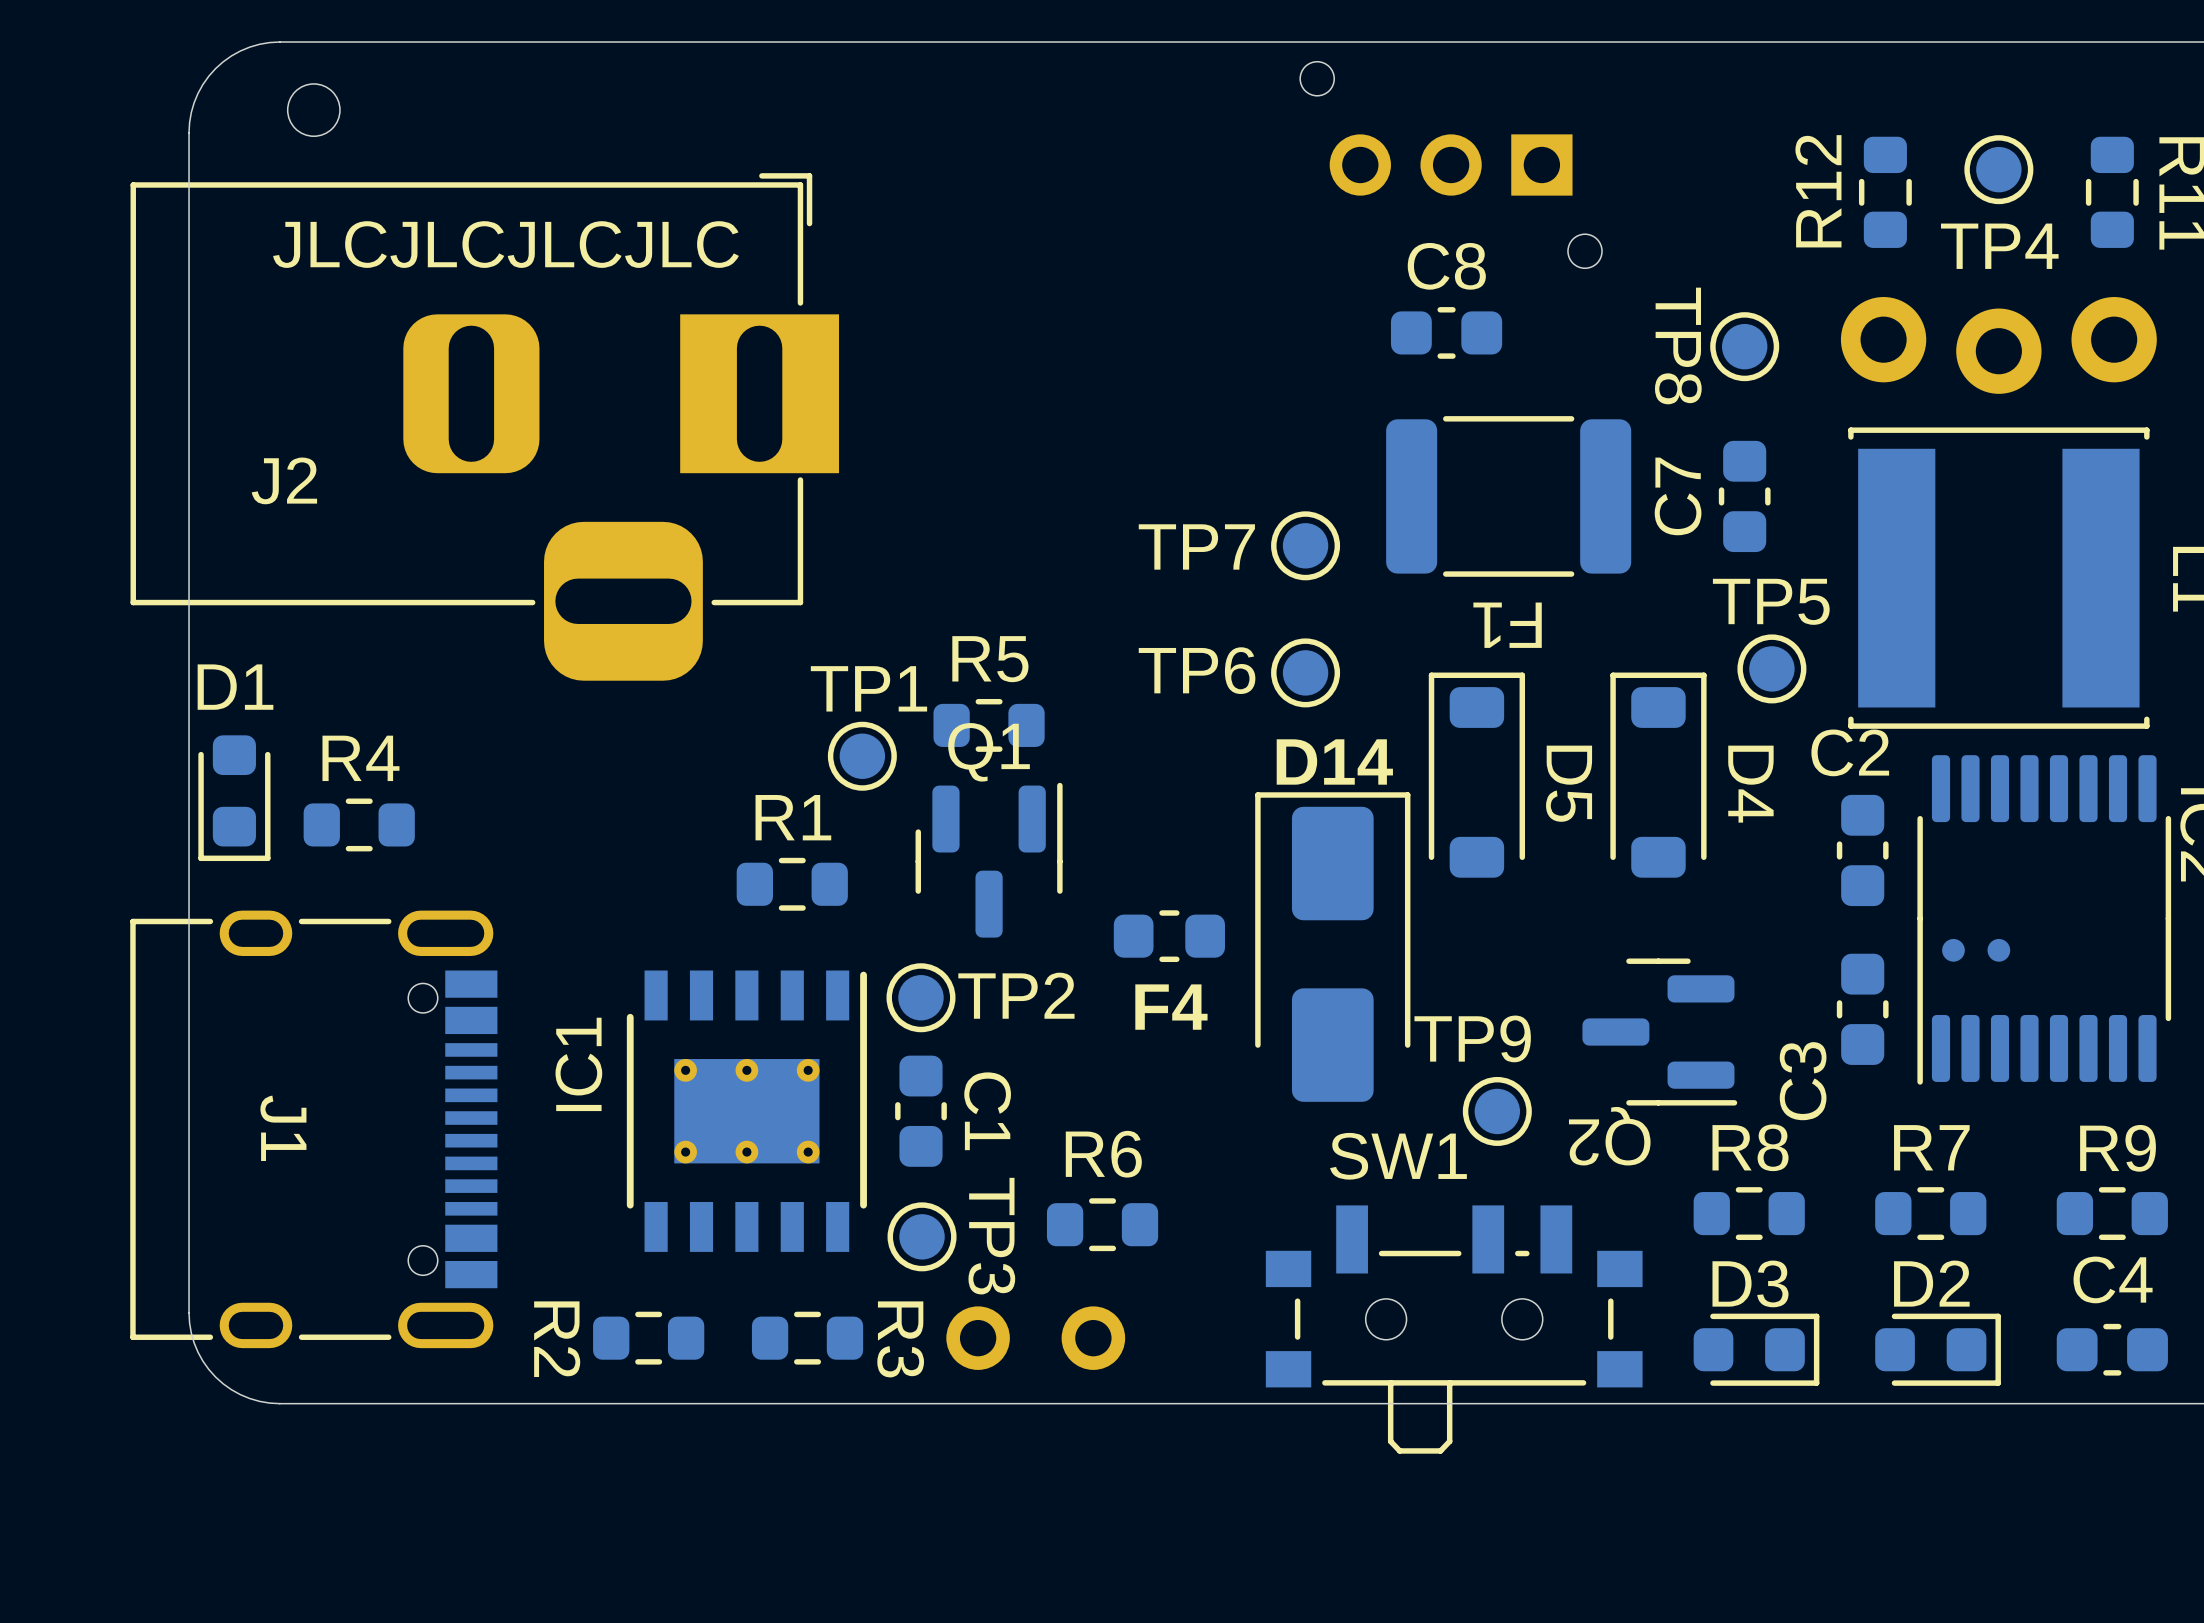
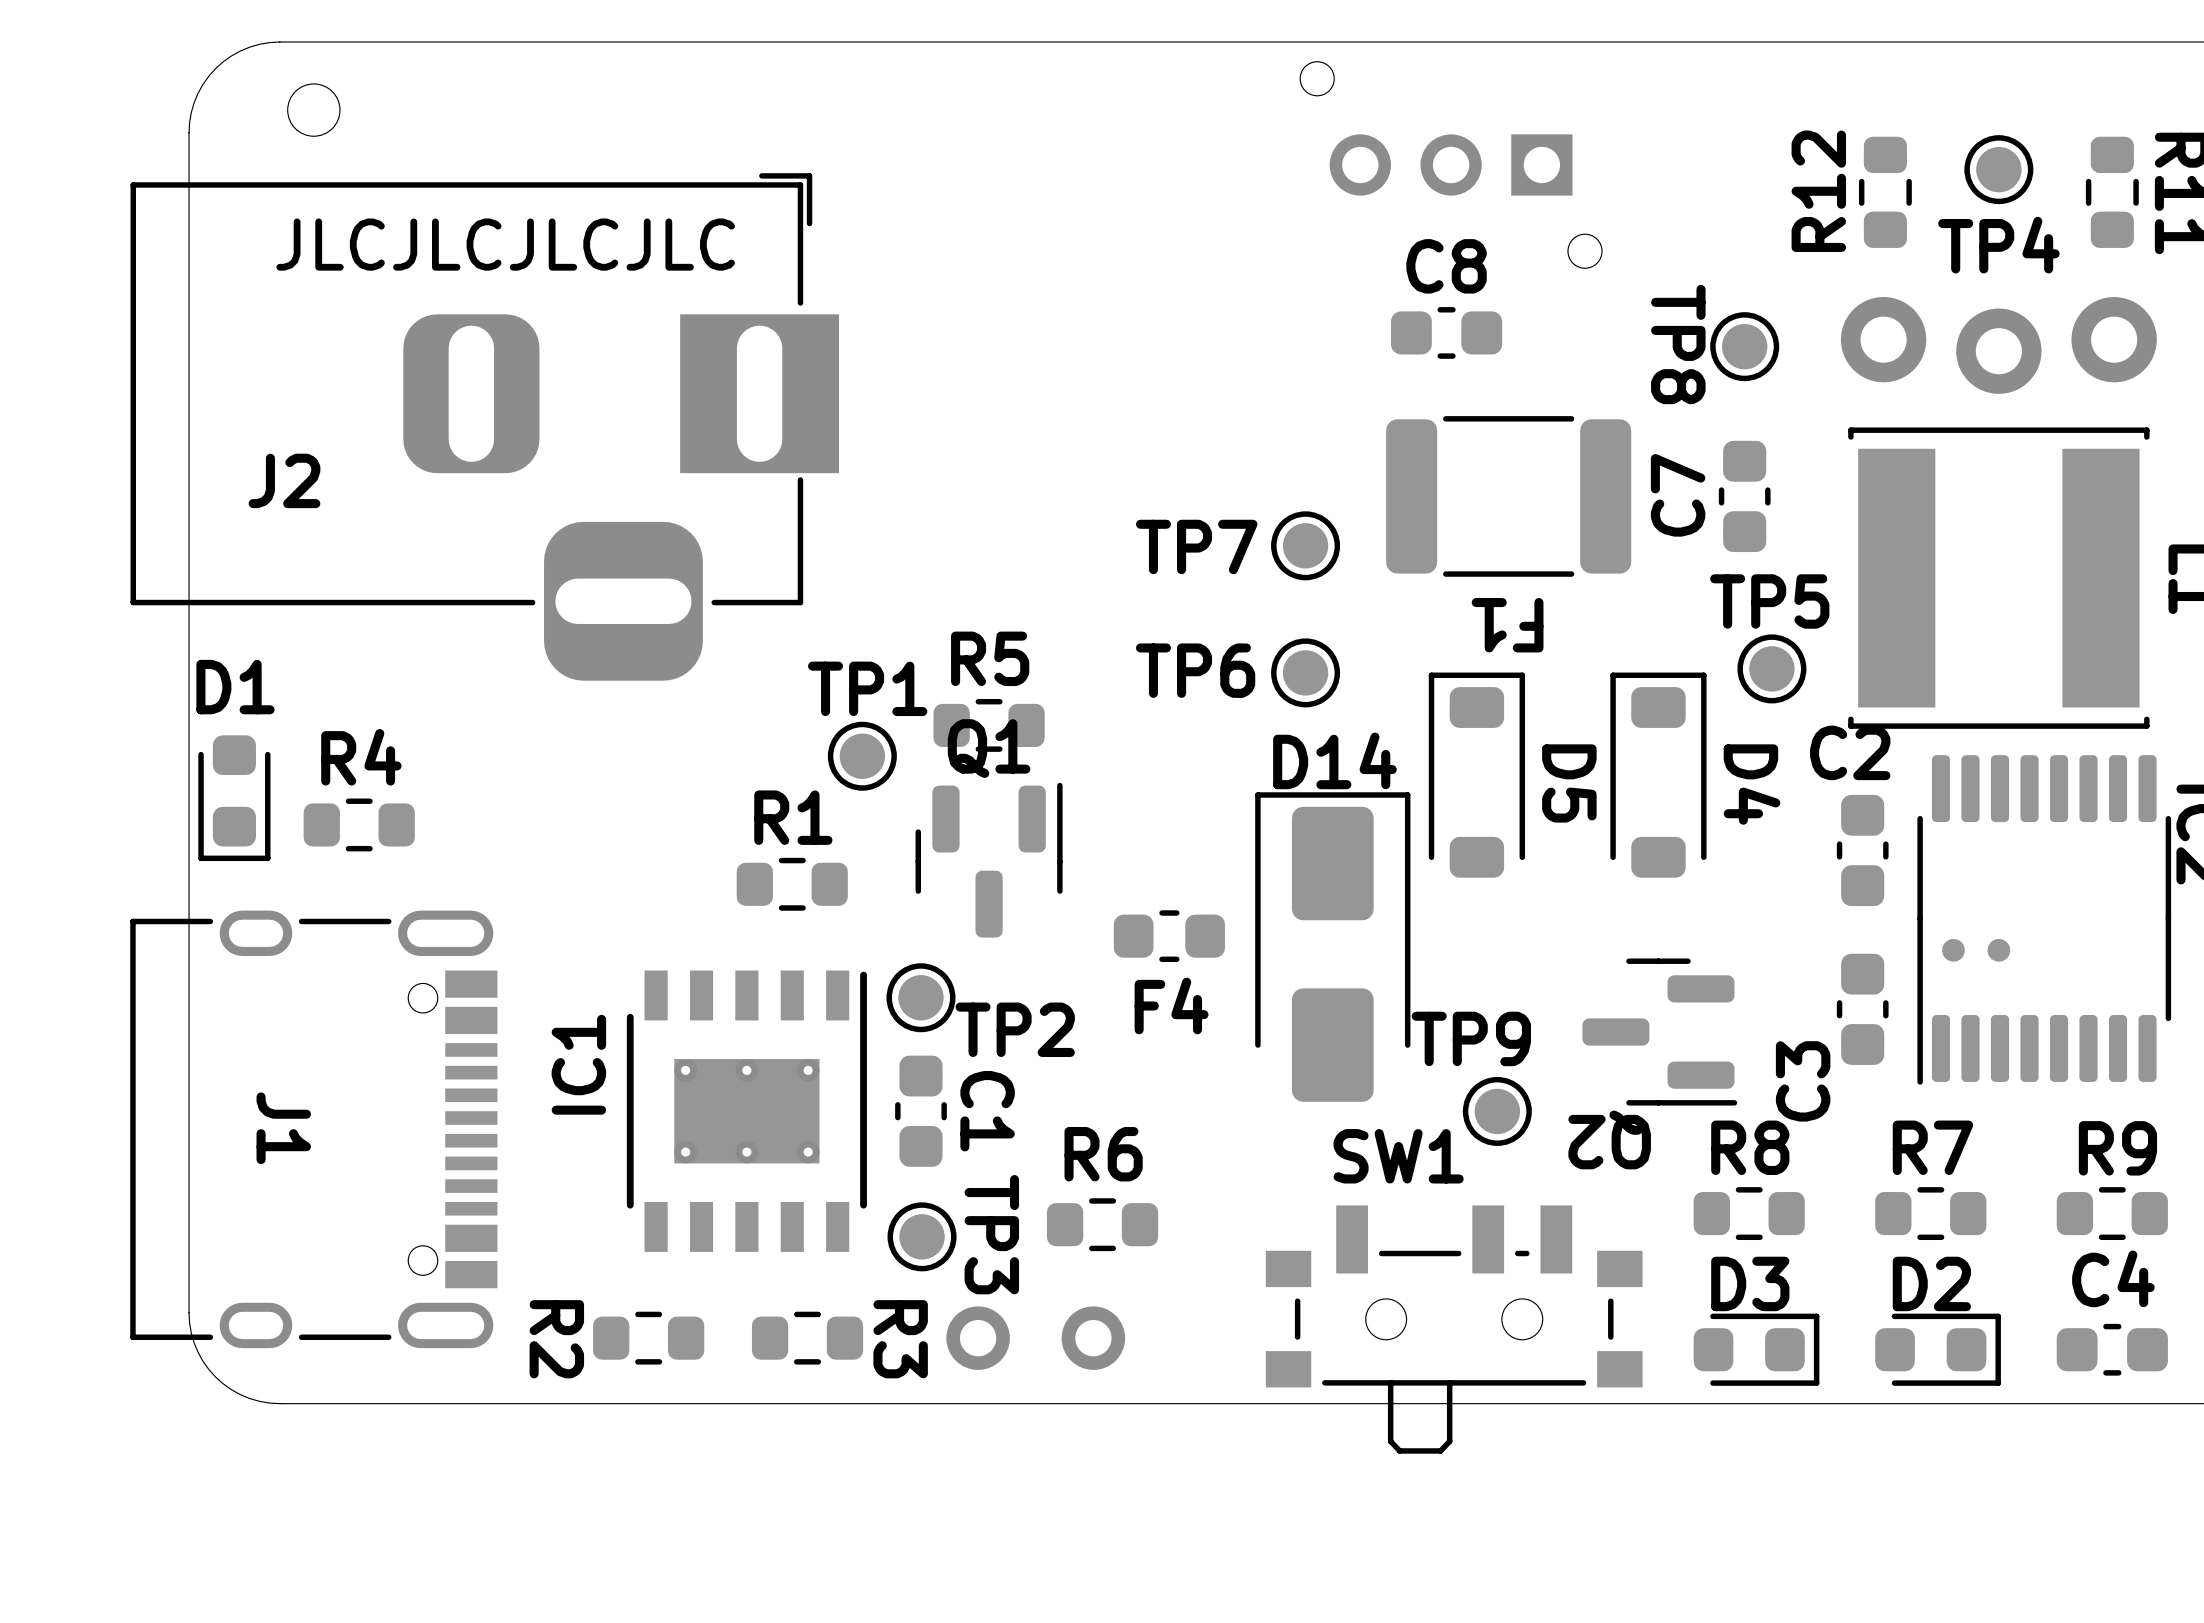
TP2 name position: TP2 (1016, 995) -> TP2 (1015, 1029)

